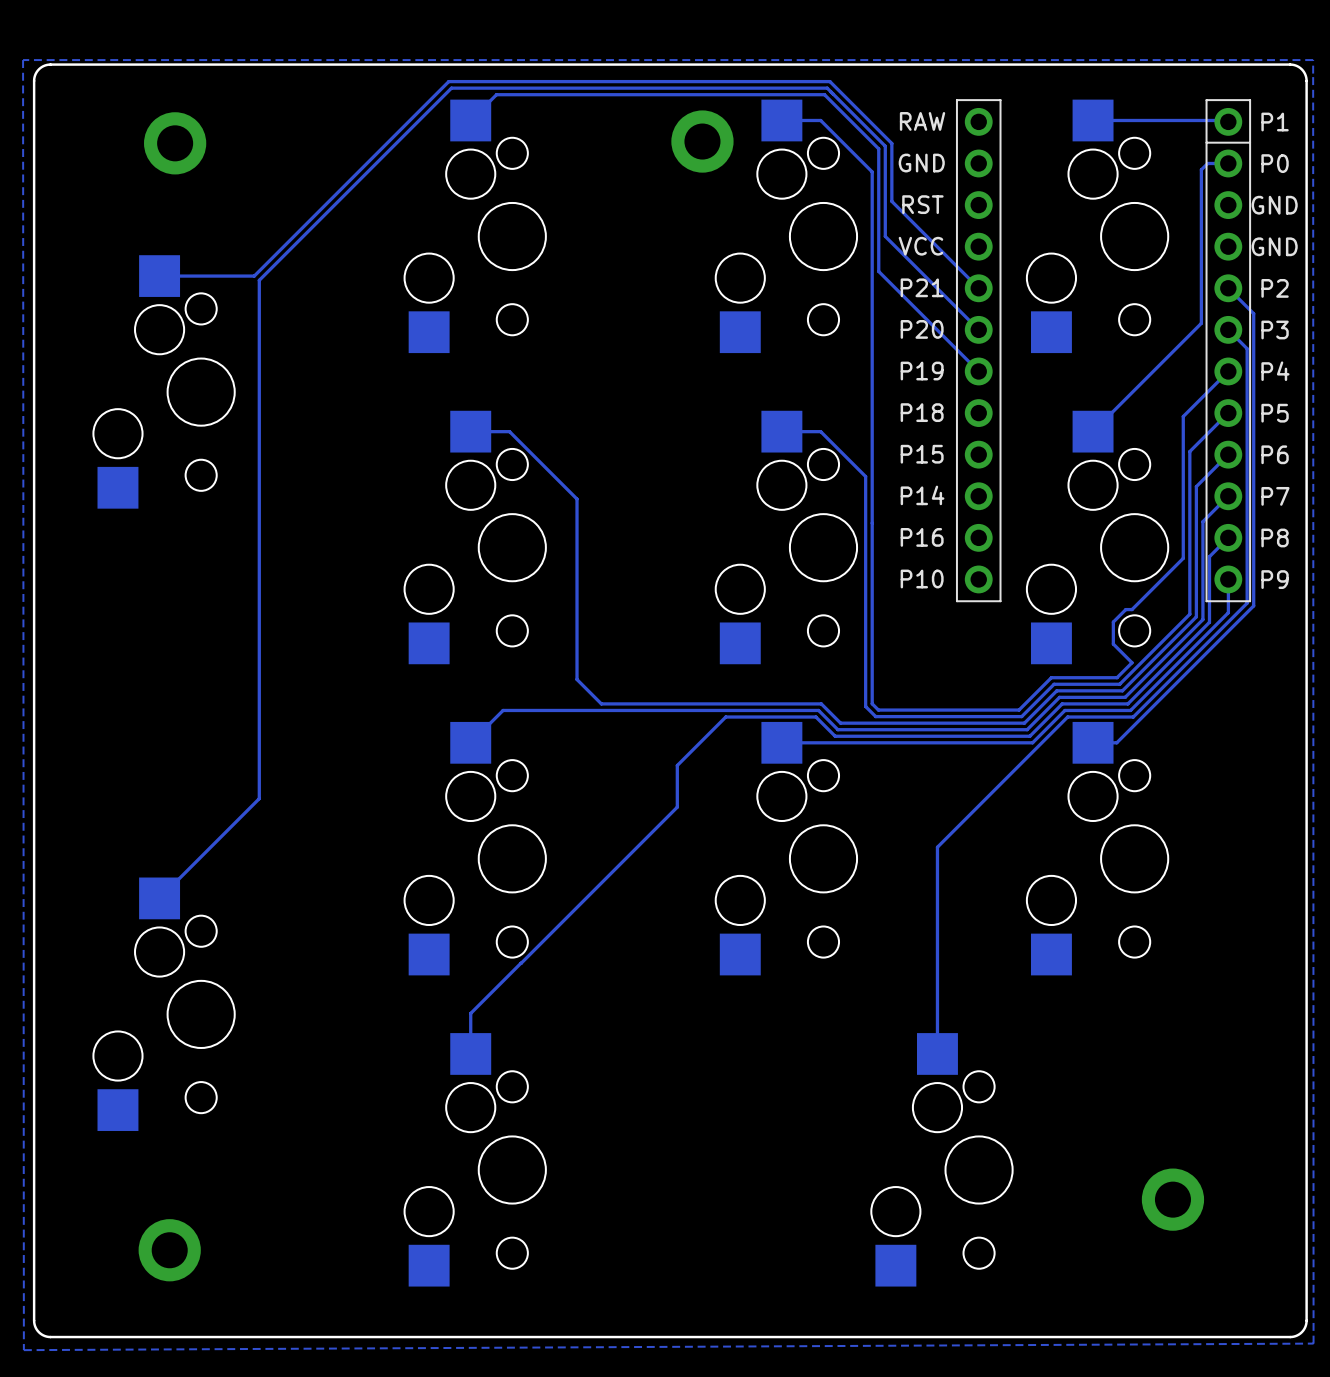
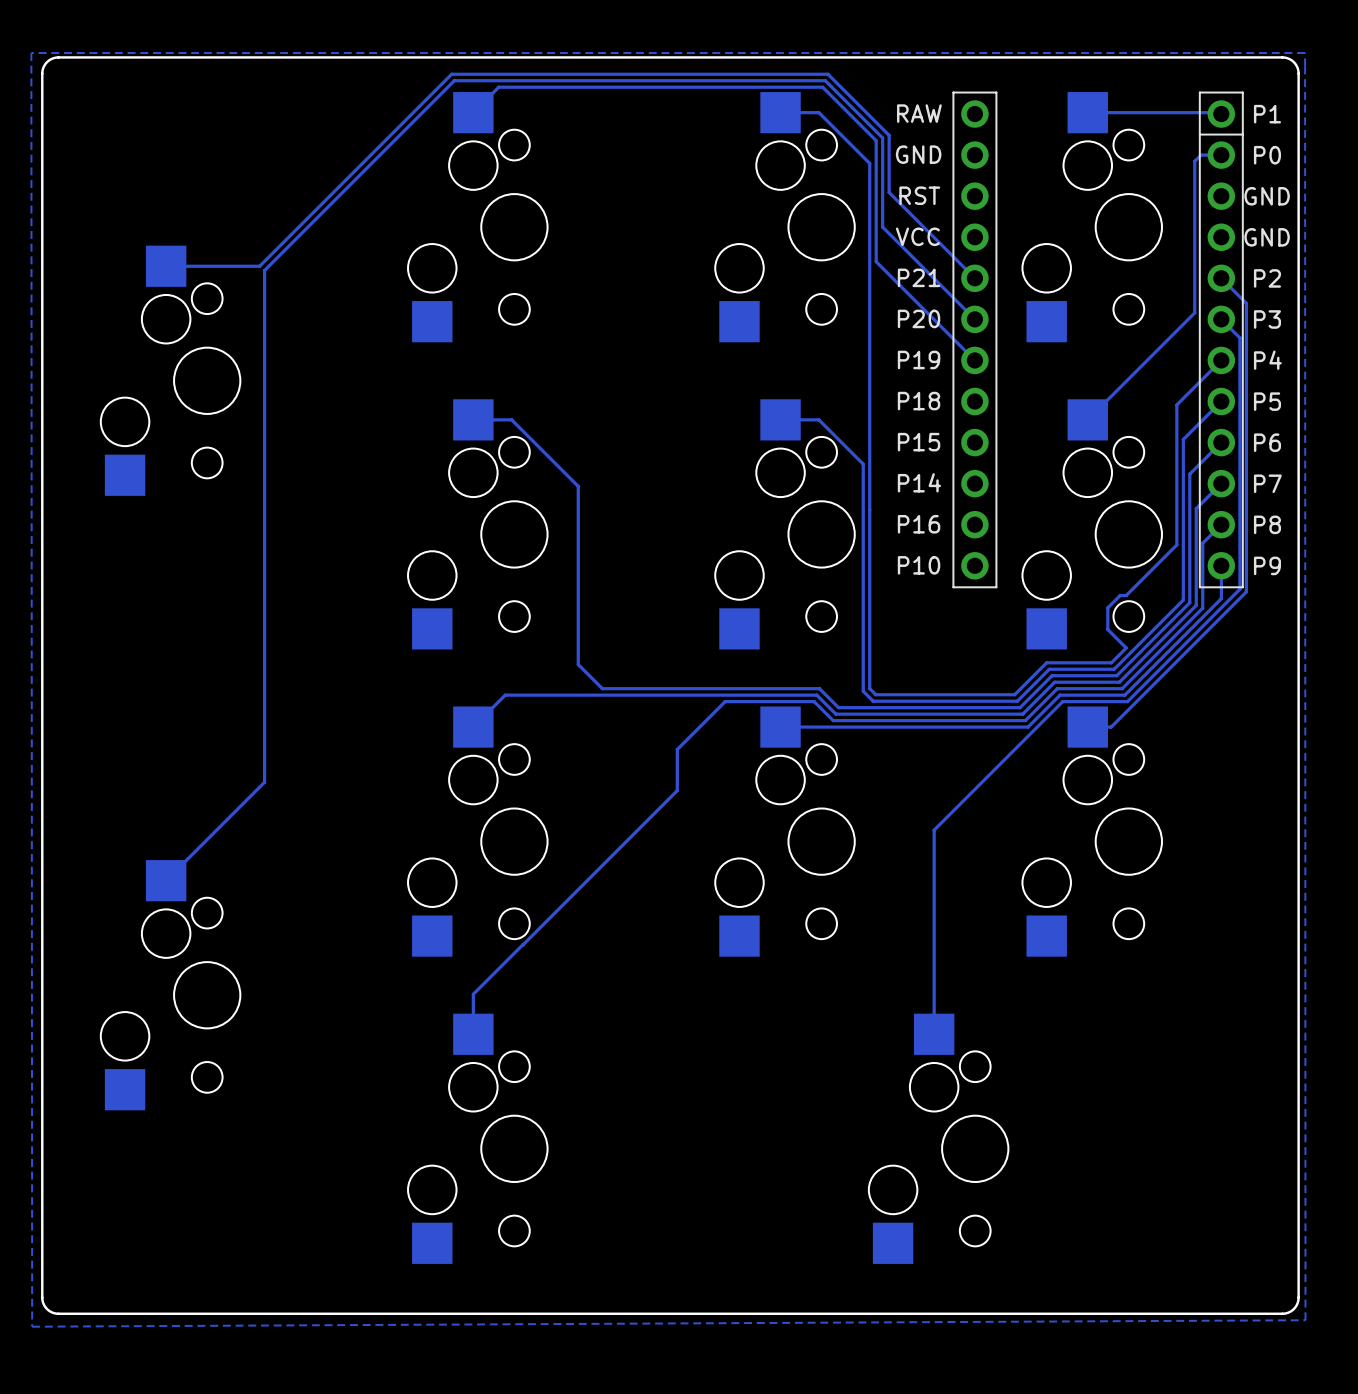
part: (702, 141) -> none
part: (175, 143) -> none
part: (1172, 1199) -> none
part: (169, 1250) -> none

